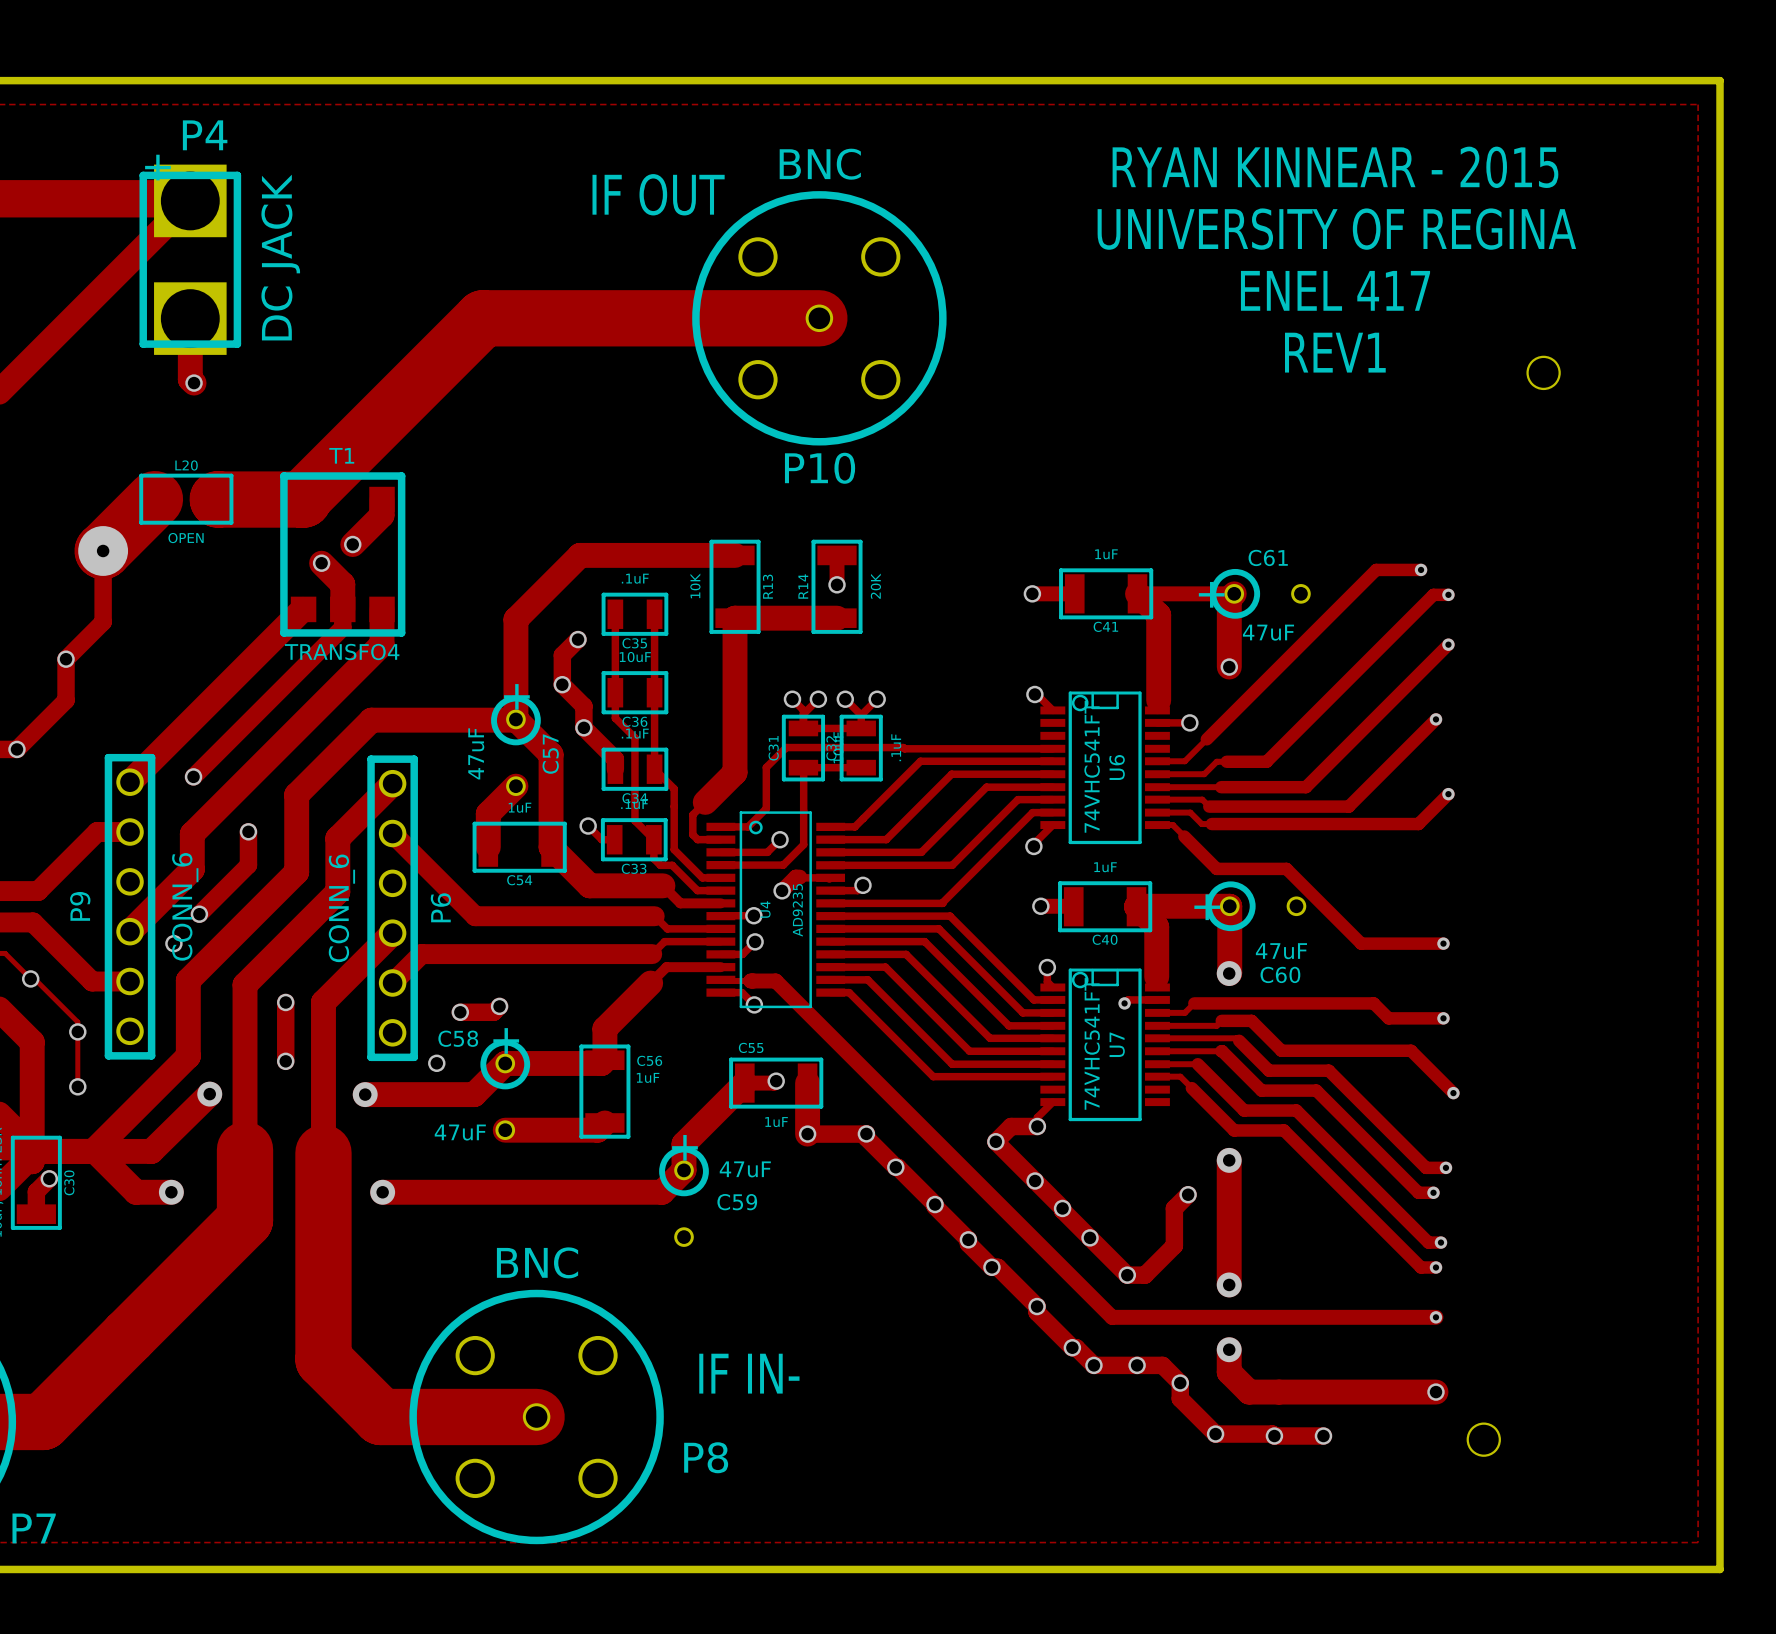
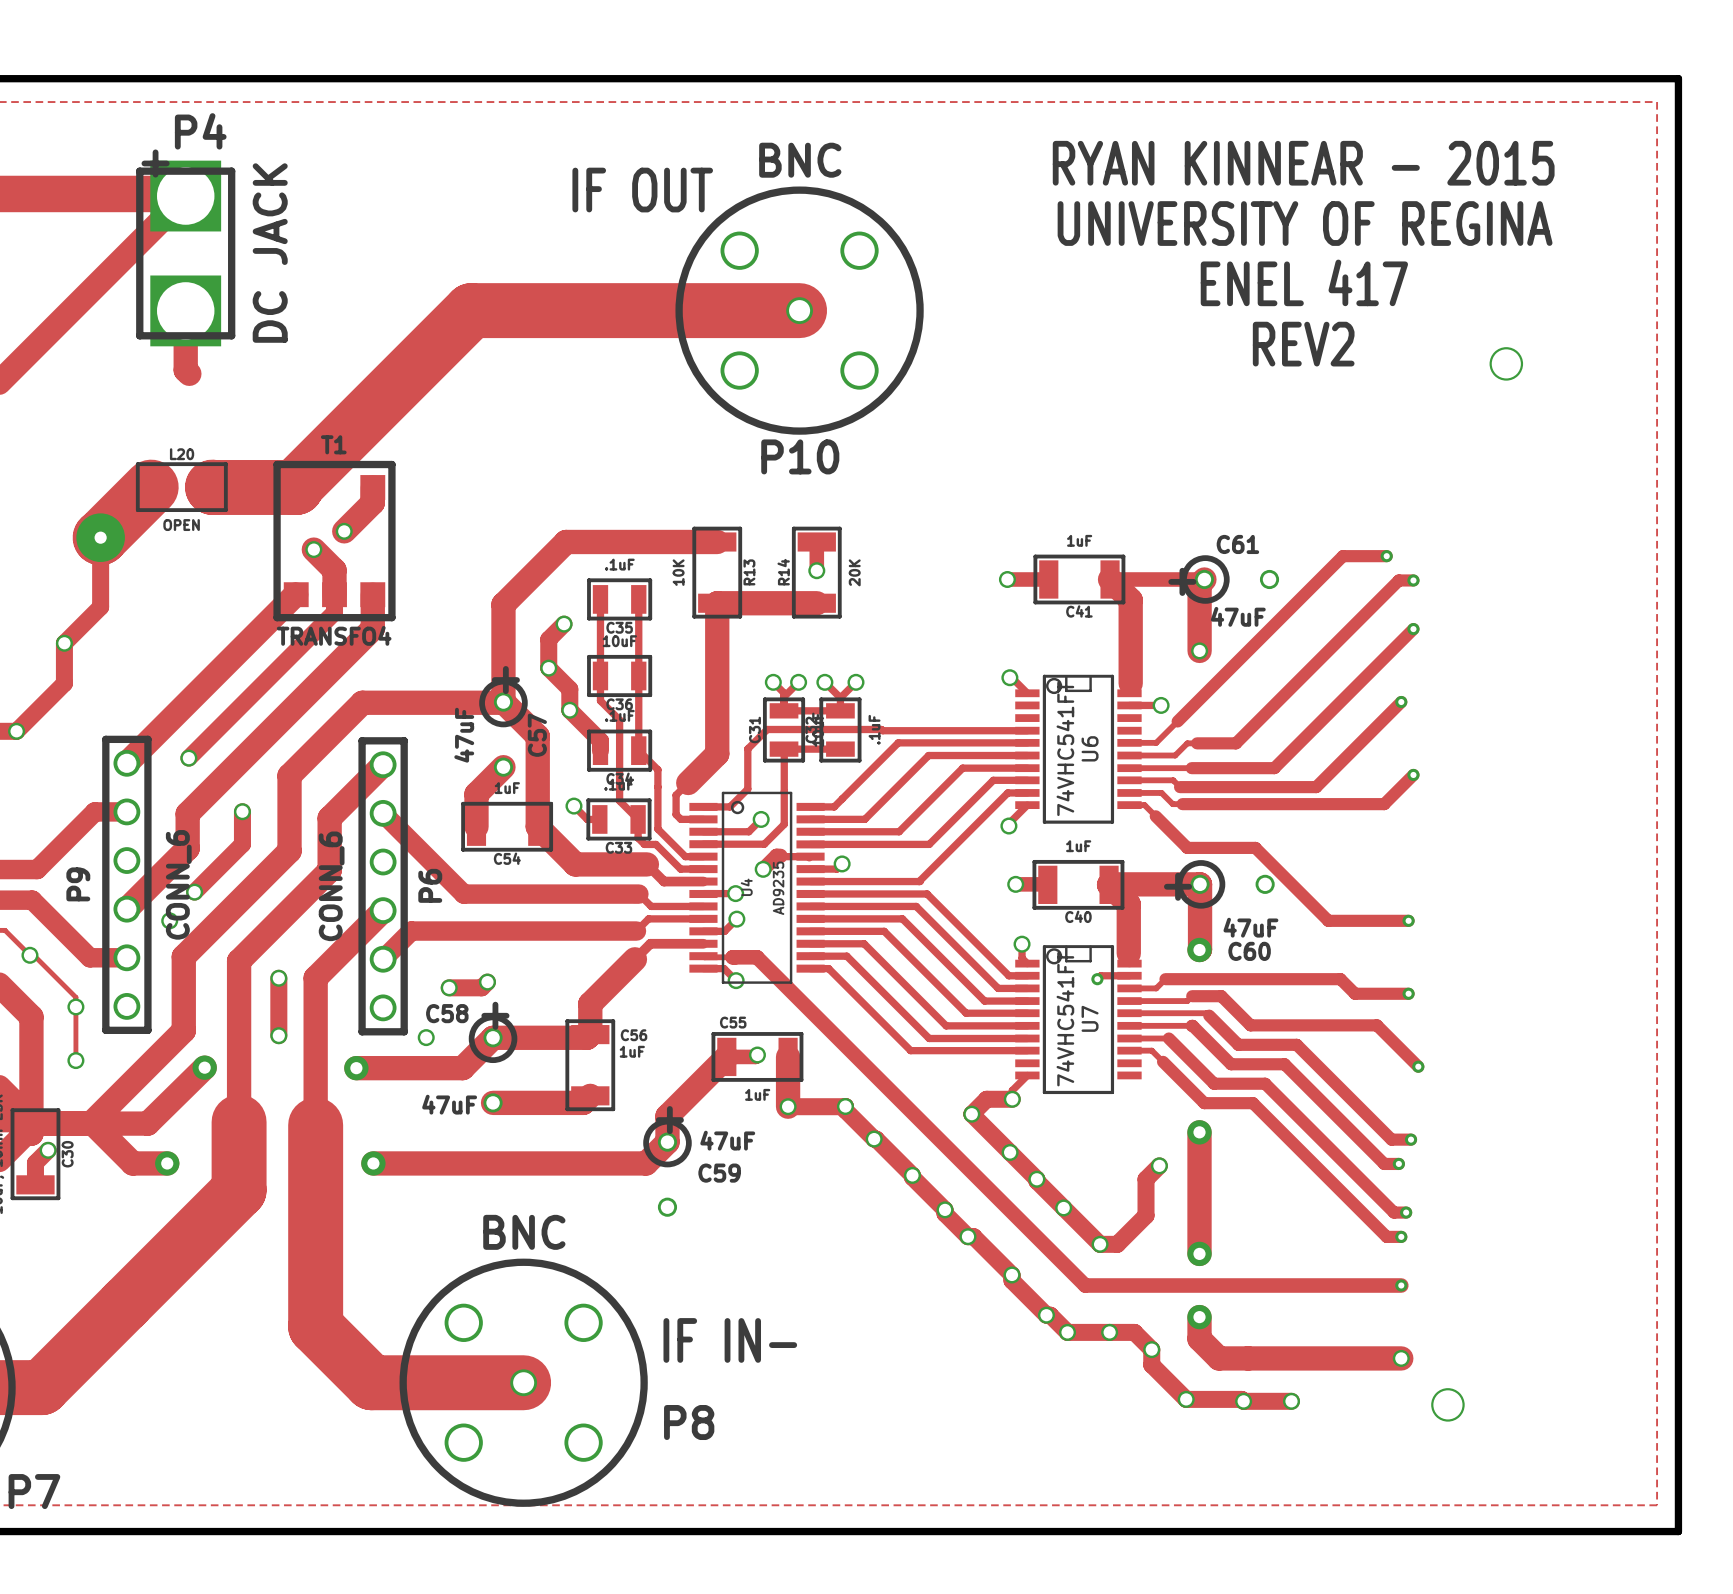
text: REV1 (1335, 352) -> REV2 (1303, 344)
via: (194, 383) -> none

